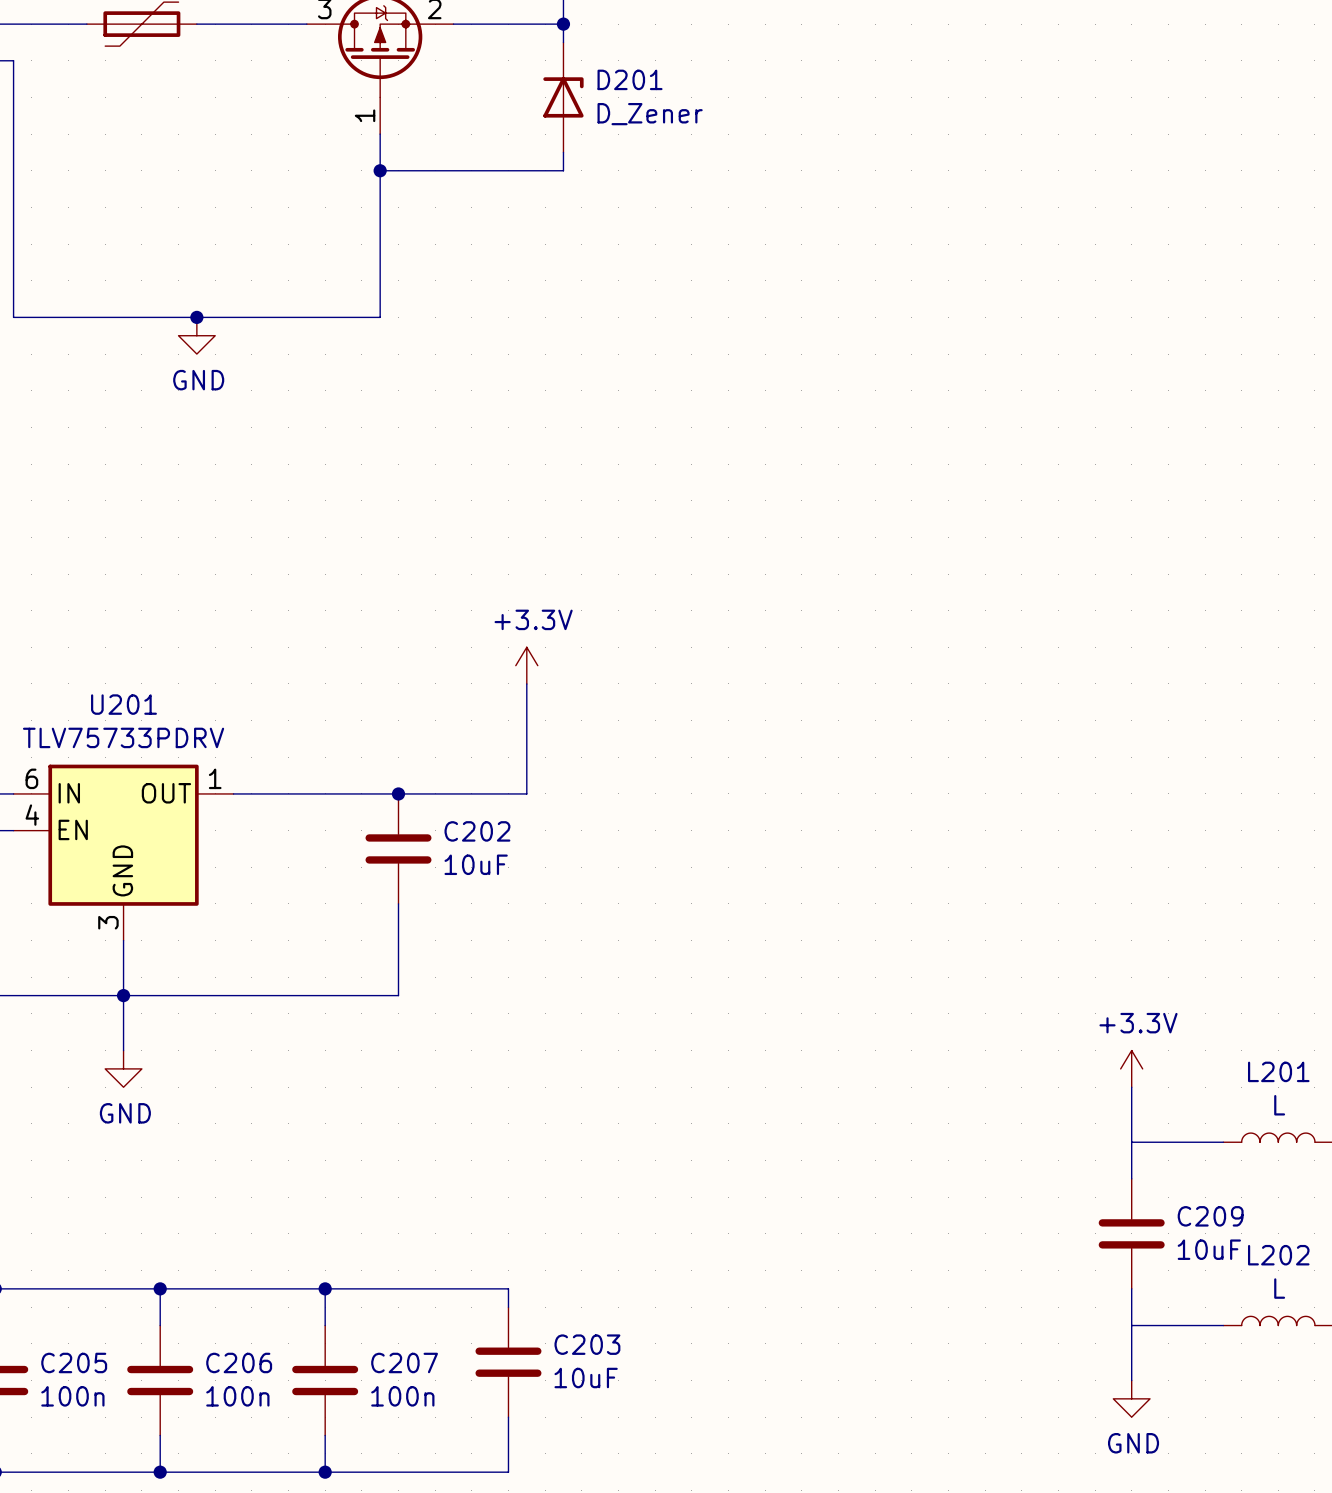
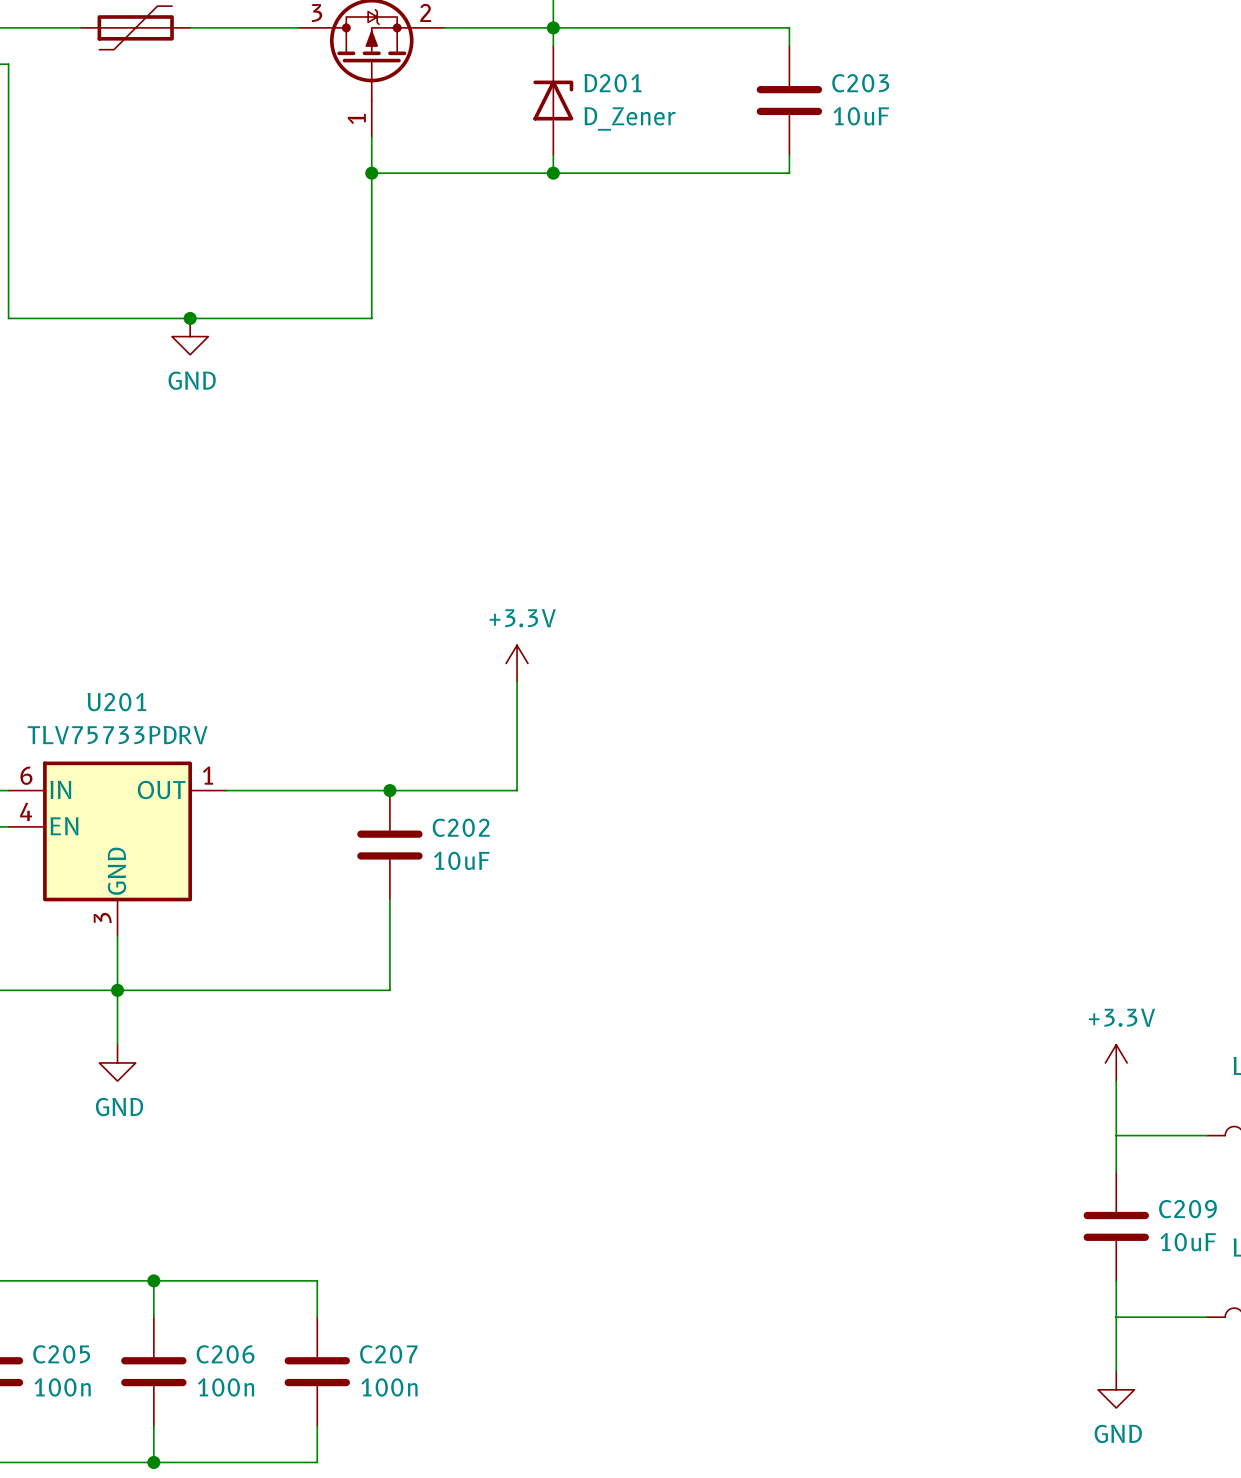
wire: none -> (553, 27) (789, 27) (789, 46)
wire: none -> (789, 155) (789, 173) (553, 173)
junction: none -> (553, 173)
wire: (325, 1288) (508, 1288) (508, 1307) -> none
junction: (325, 1288) -> none
C203 position: (508, 1362) -> (789, 100)
wire: (508, 1417) (508, 1472) (325, 1472) -> none
junction: (325, 1472) -> none

